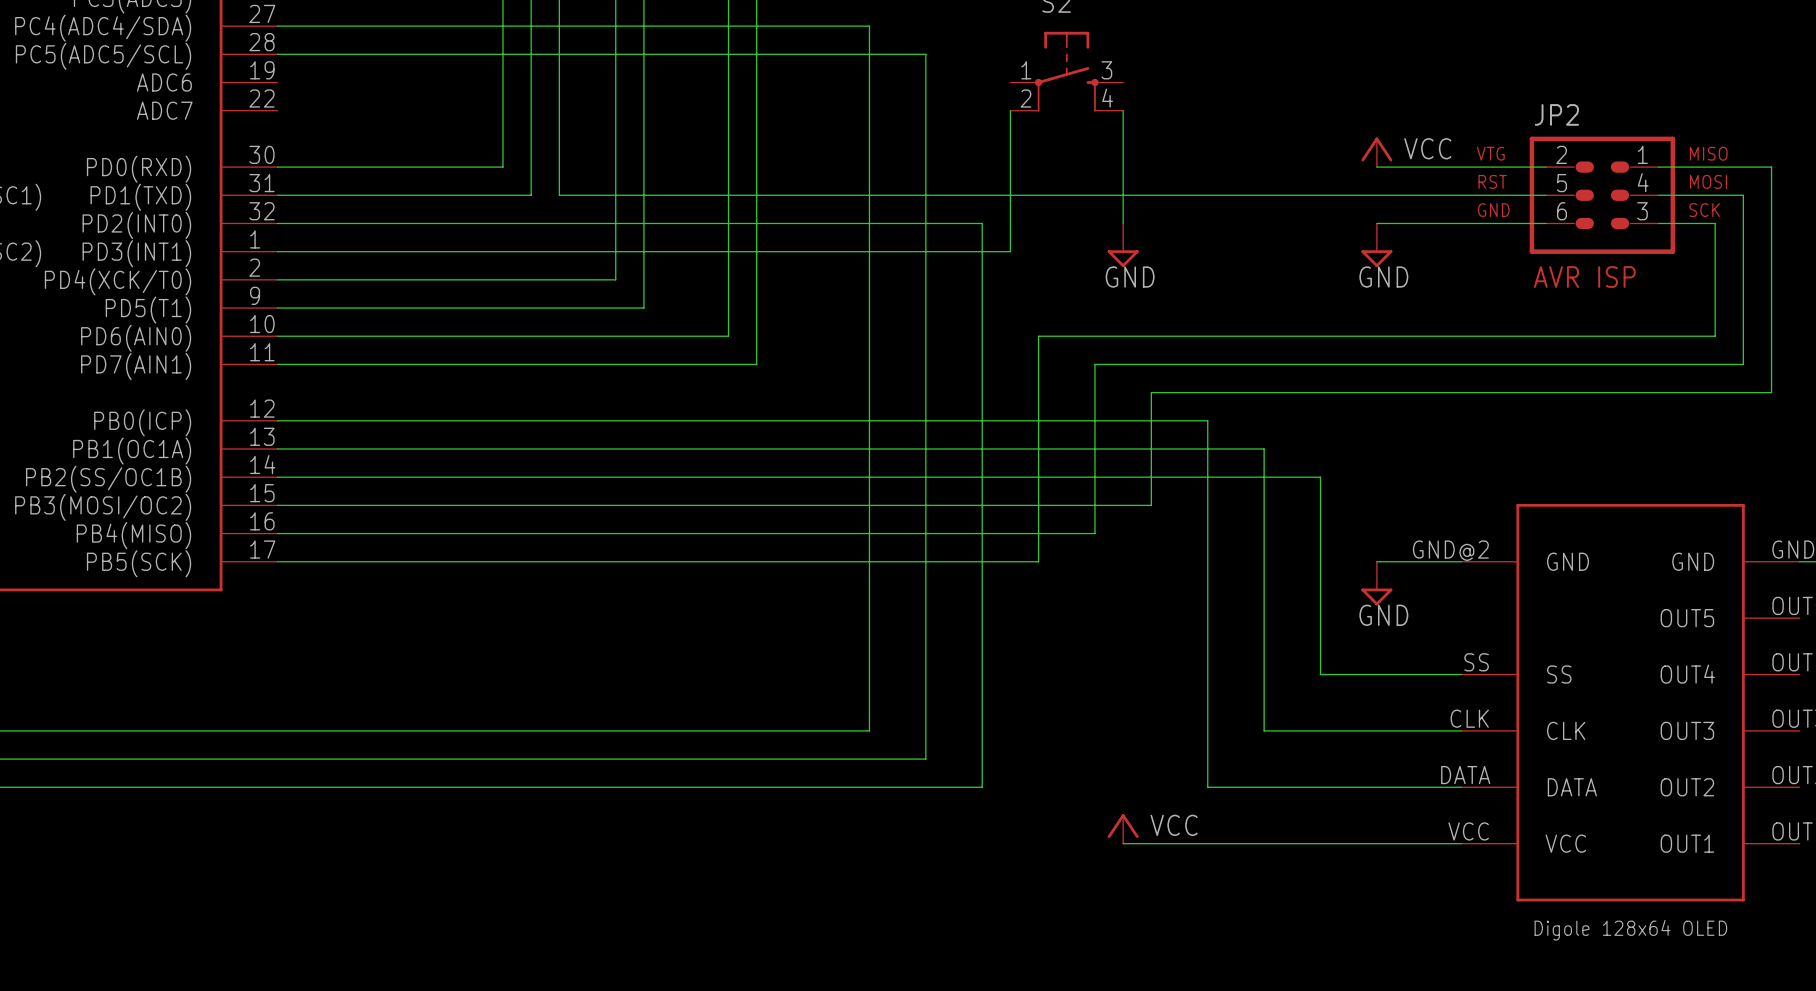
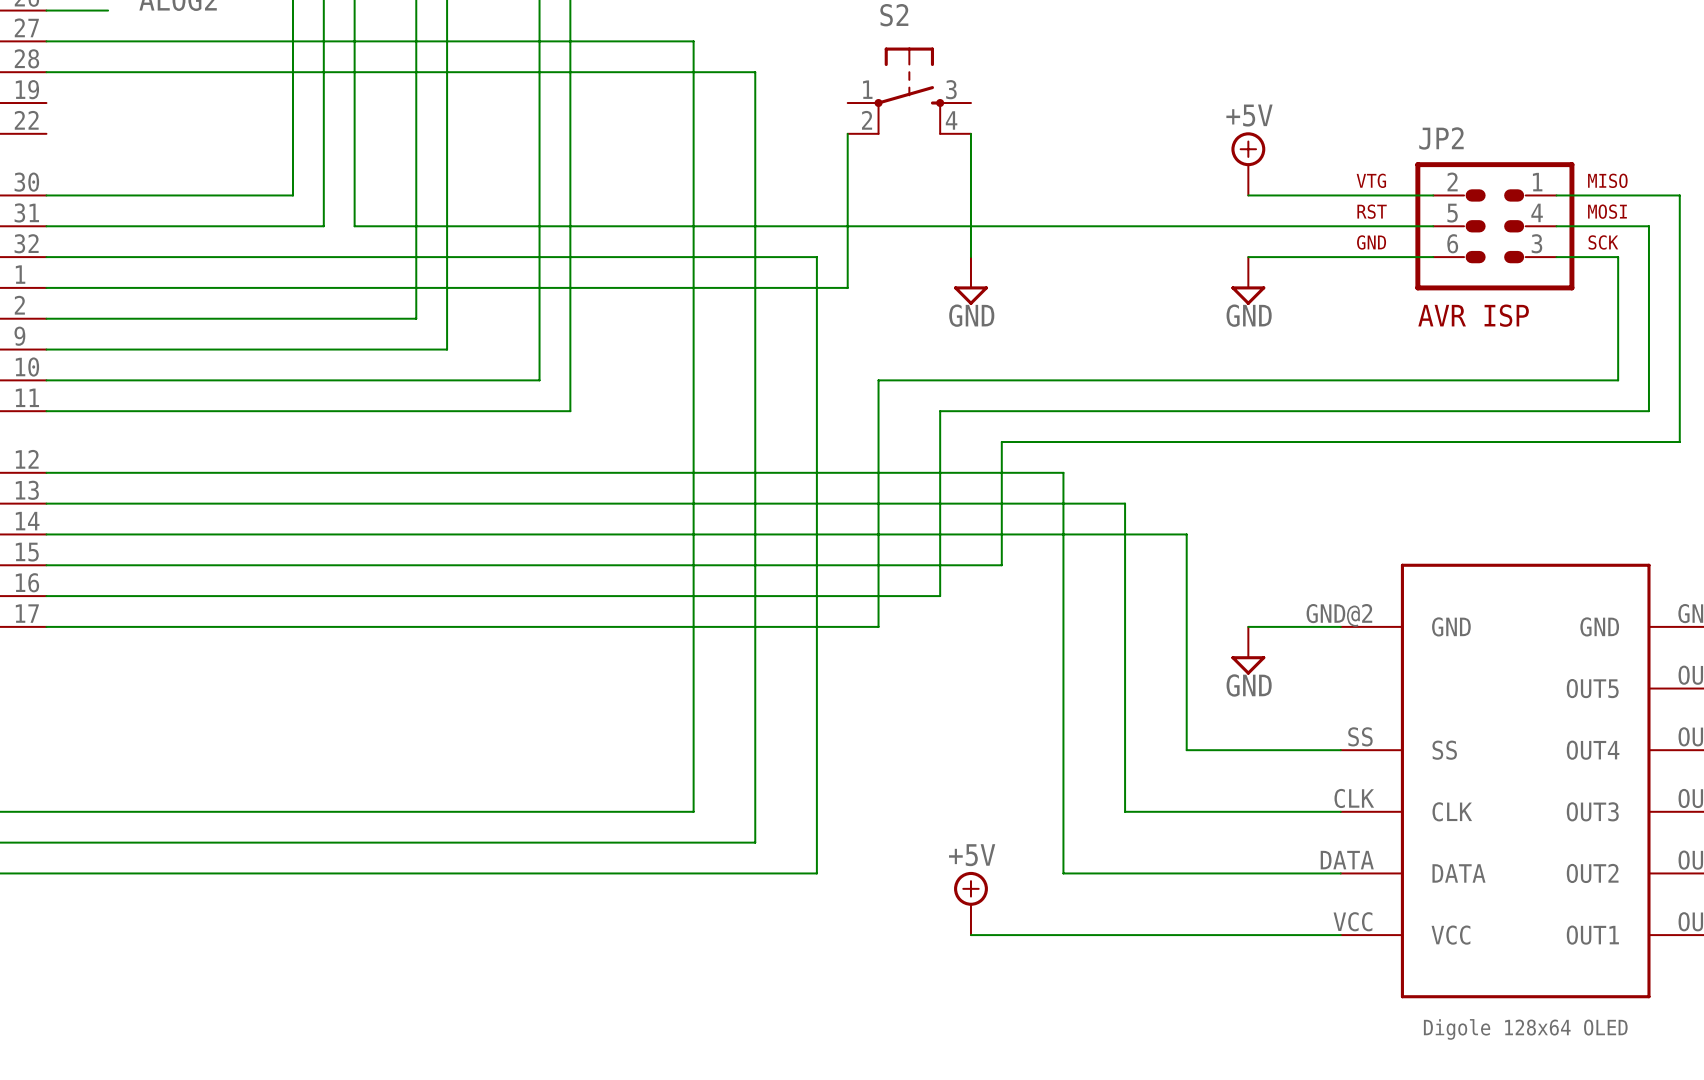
power symbol: none -> +5V (1248, 163)
power symbol: VCC (1376, 152) -> none
power symbol: none -> +5V (970, 903)
power symbol: VCC (1123, 828) -> none

